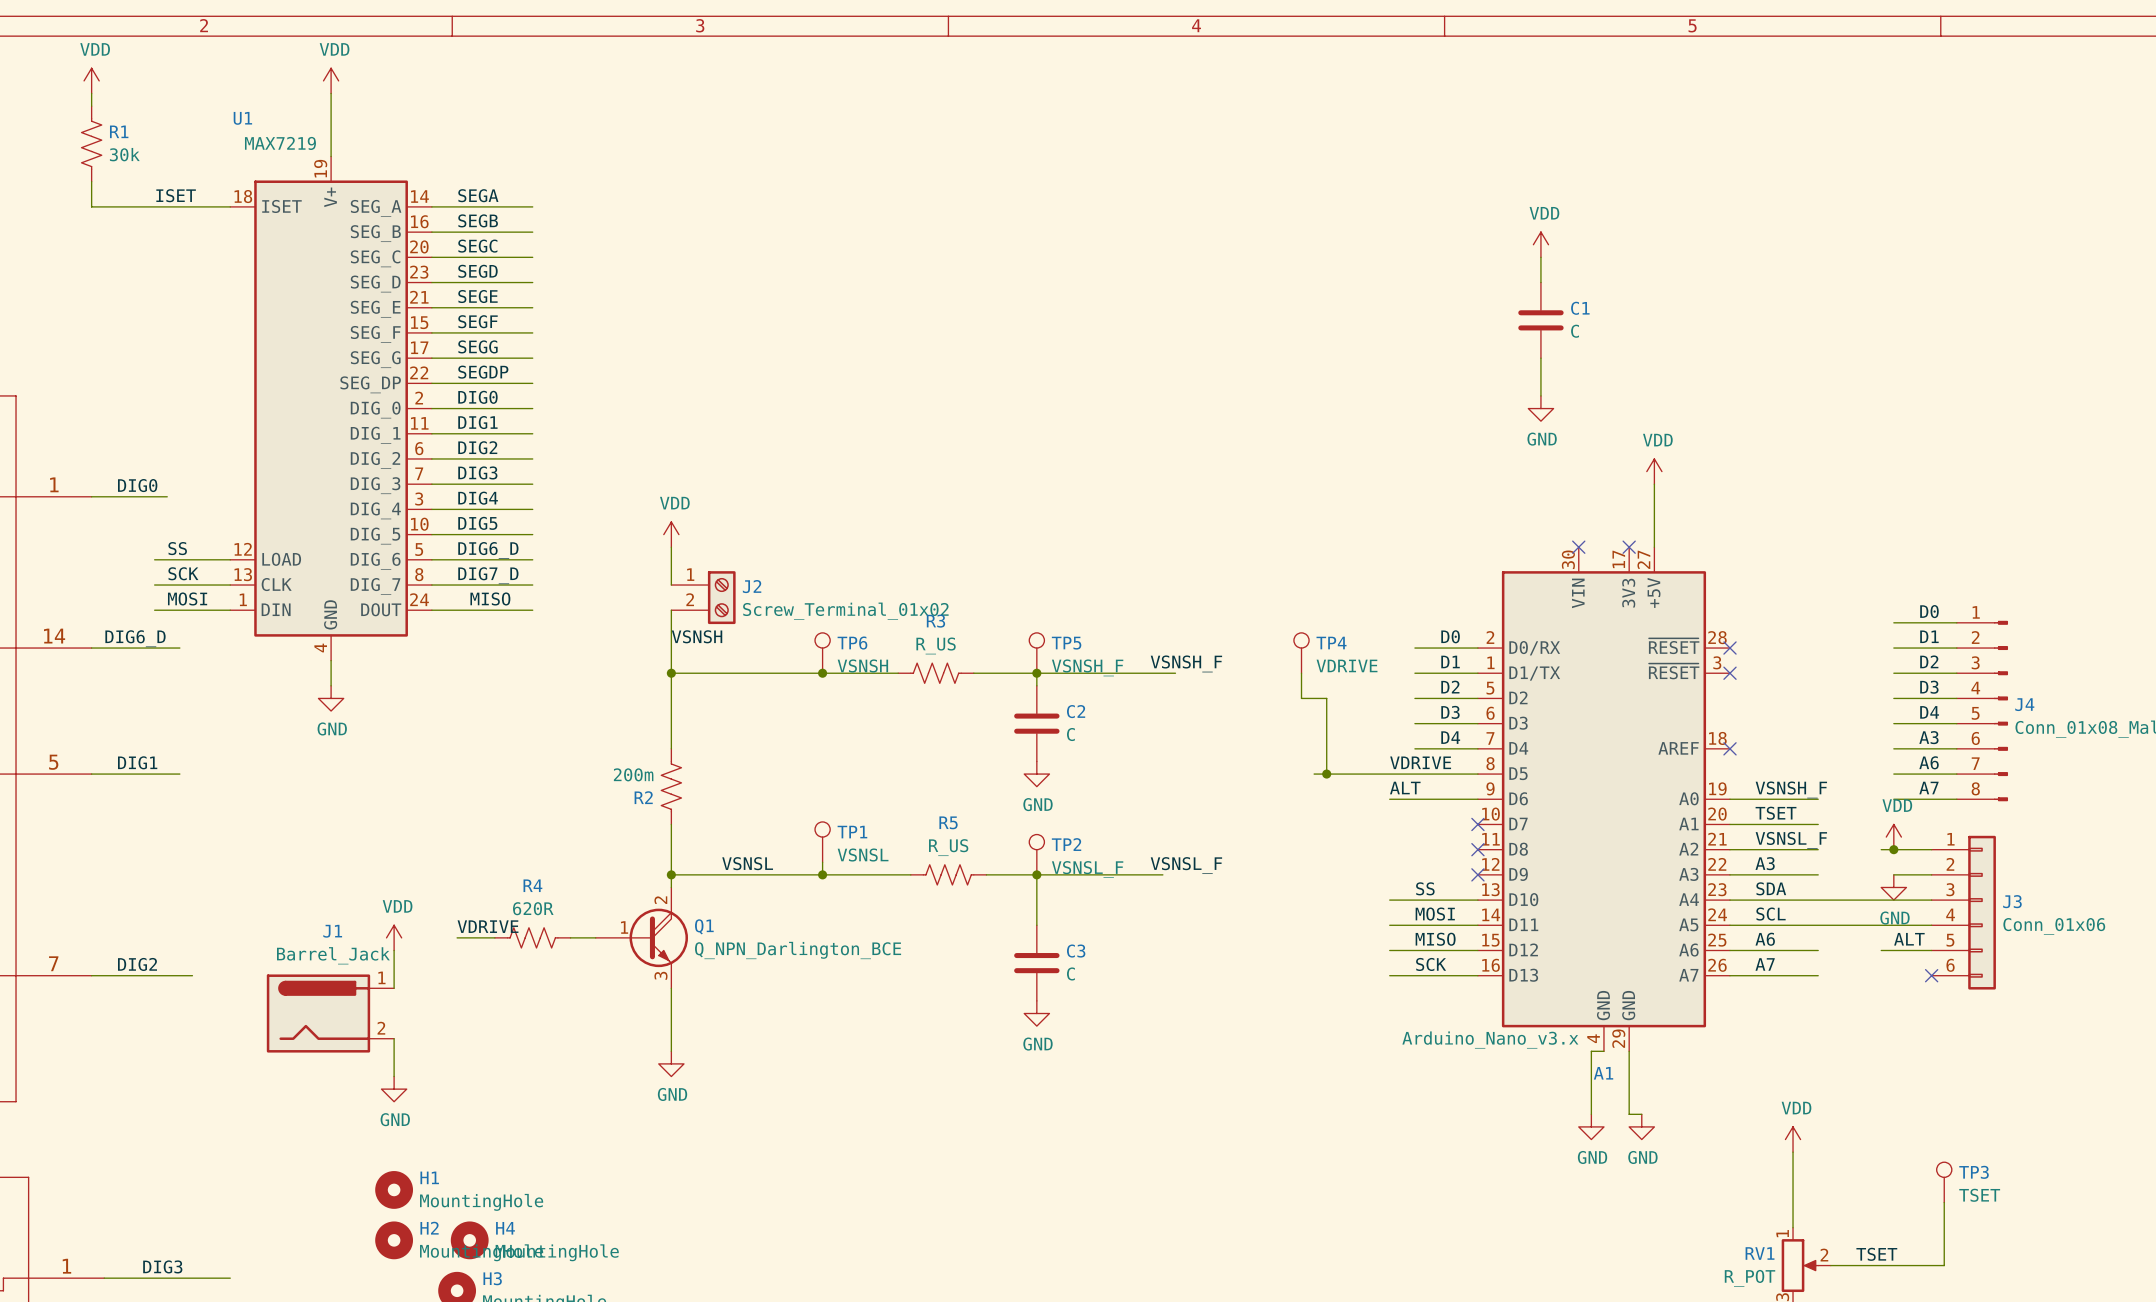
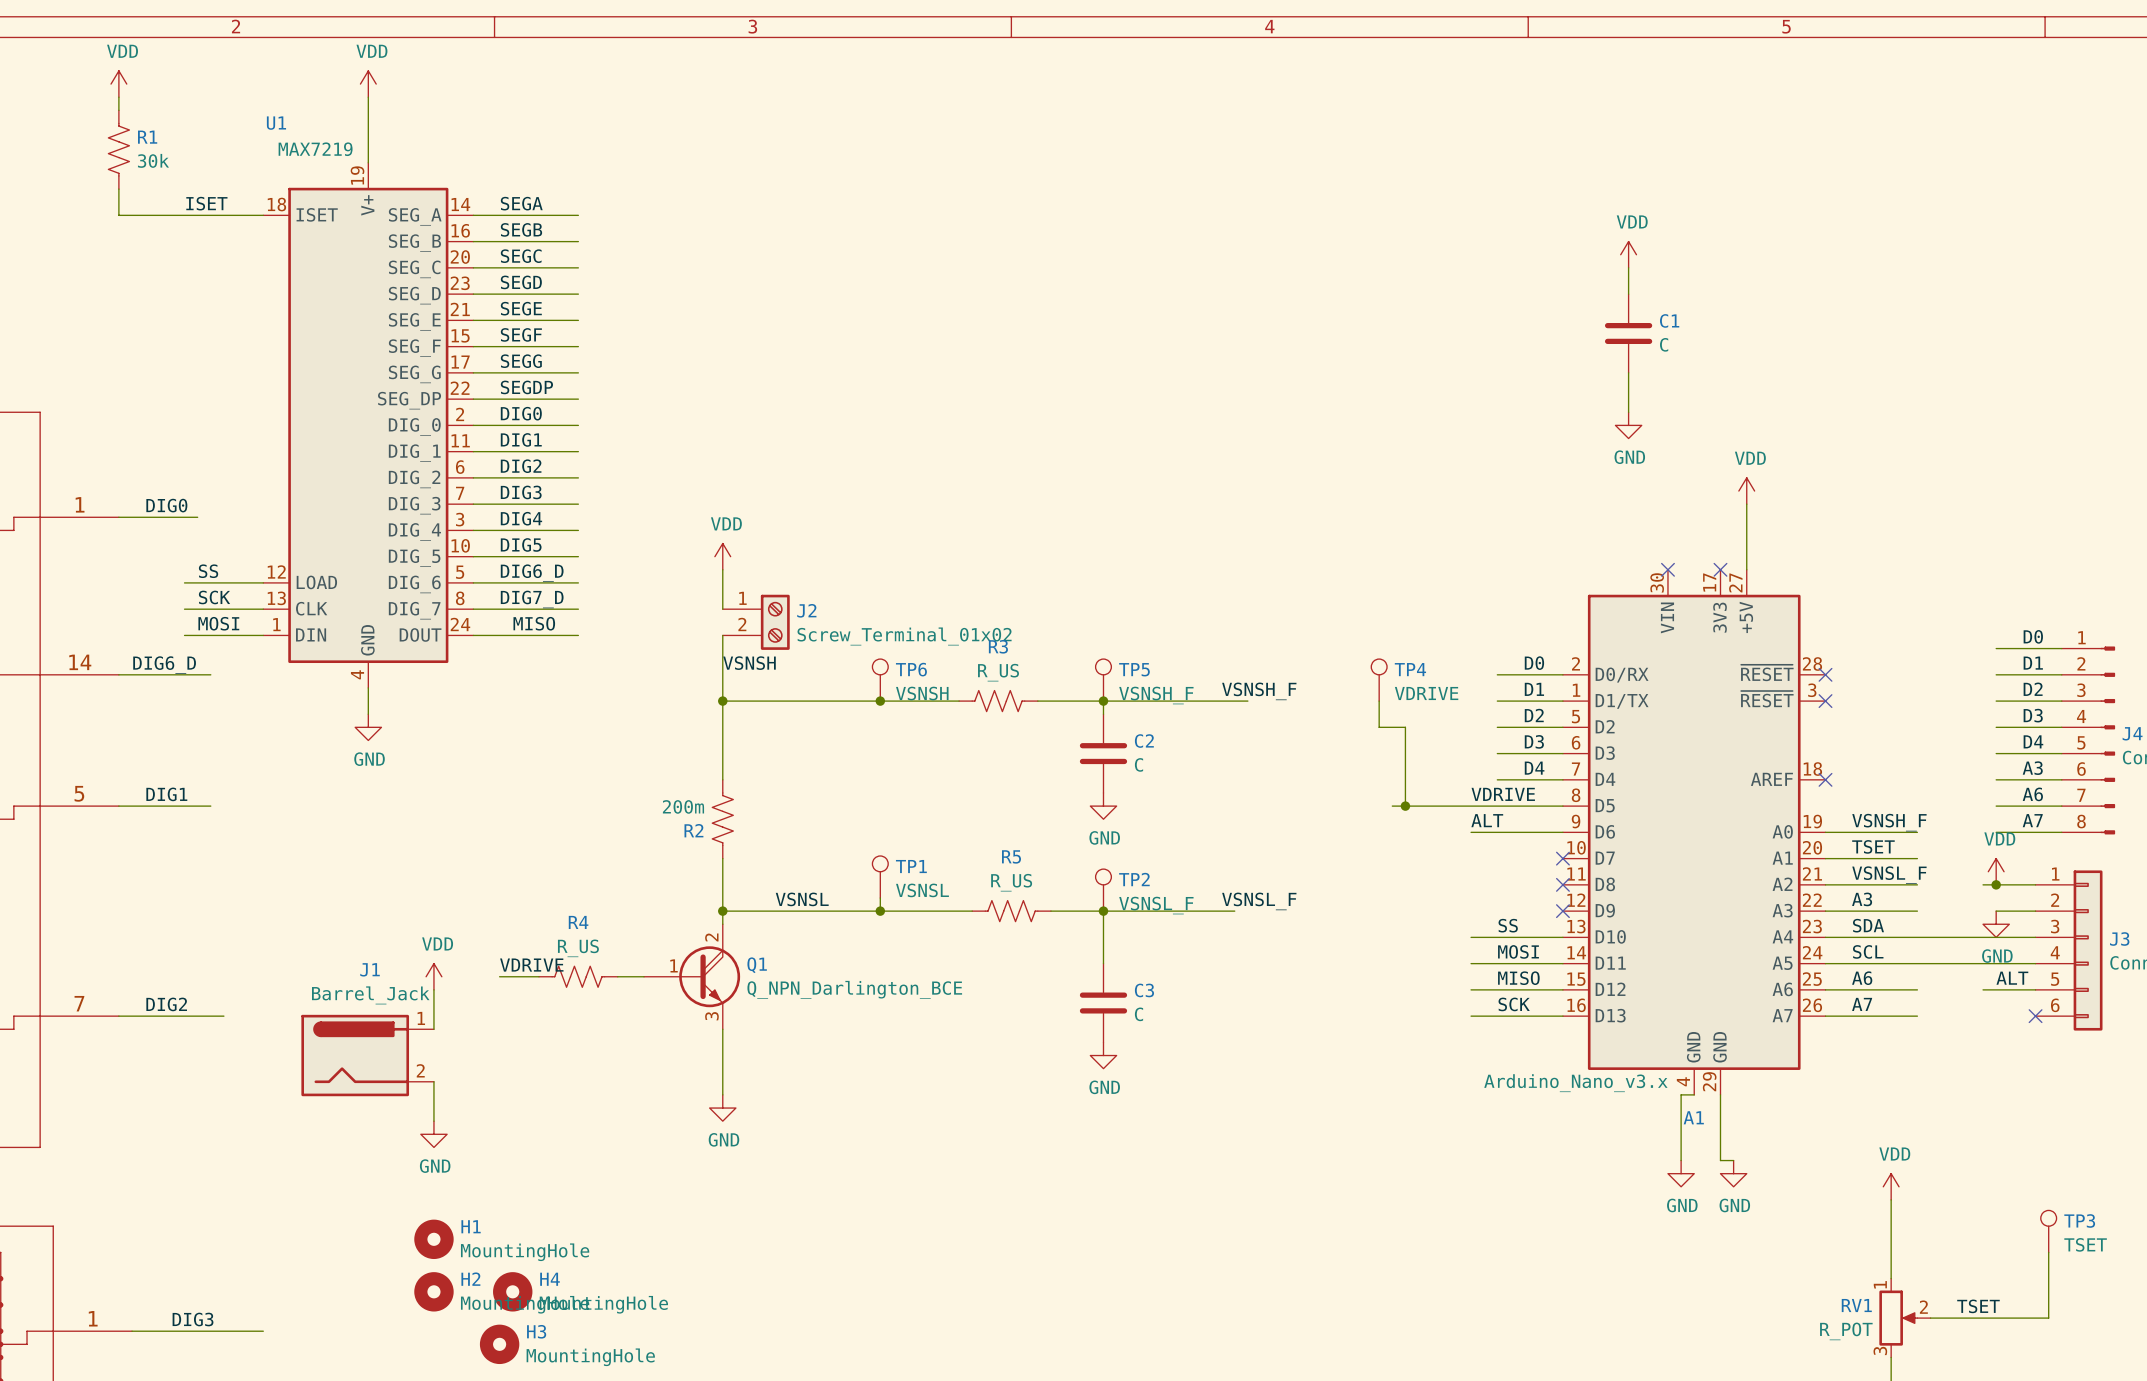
R4 value: 620R (533, 908) -> R_US (578, 948)

